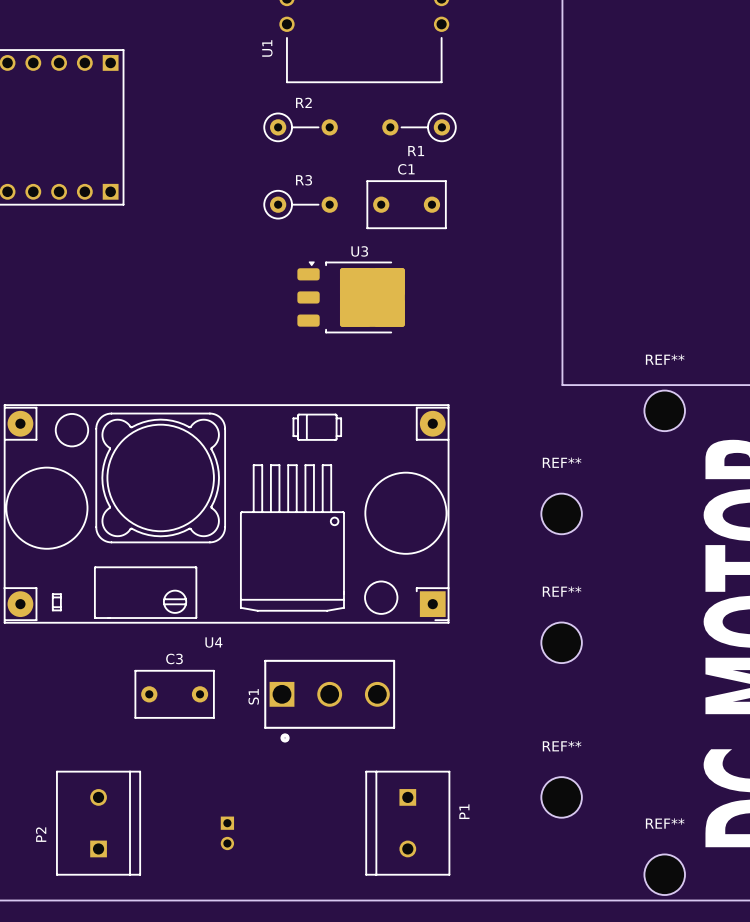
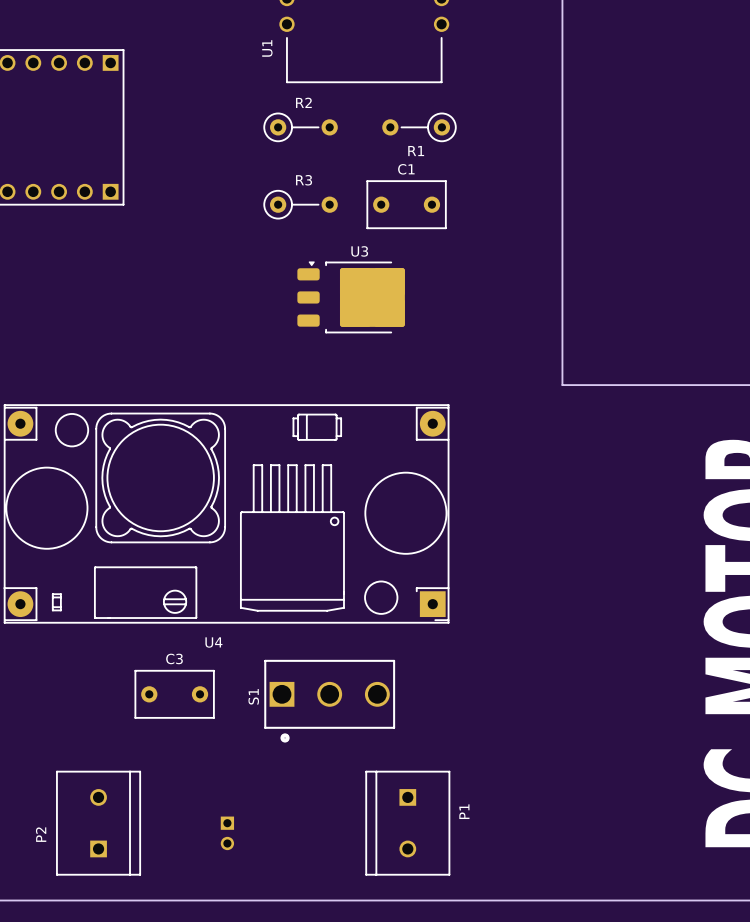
REF**: (664, 410) -> none
REF**: (561, 513) -> none
REF**: (561, 642) -> none
REF**: (561, 797) -> none
REF**: (664, 874) -> none

